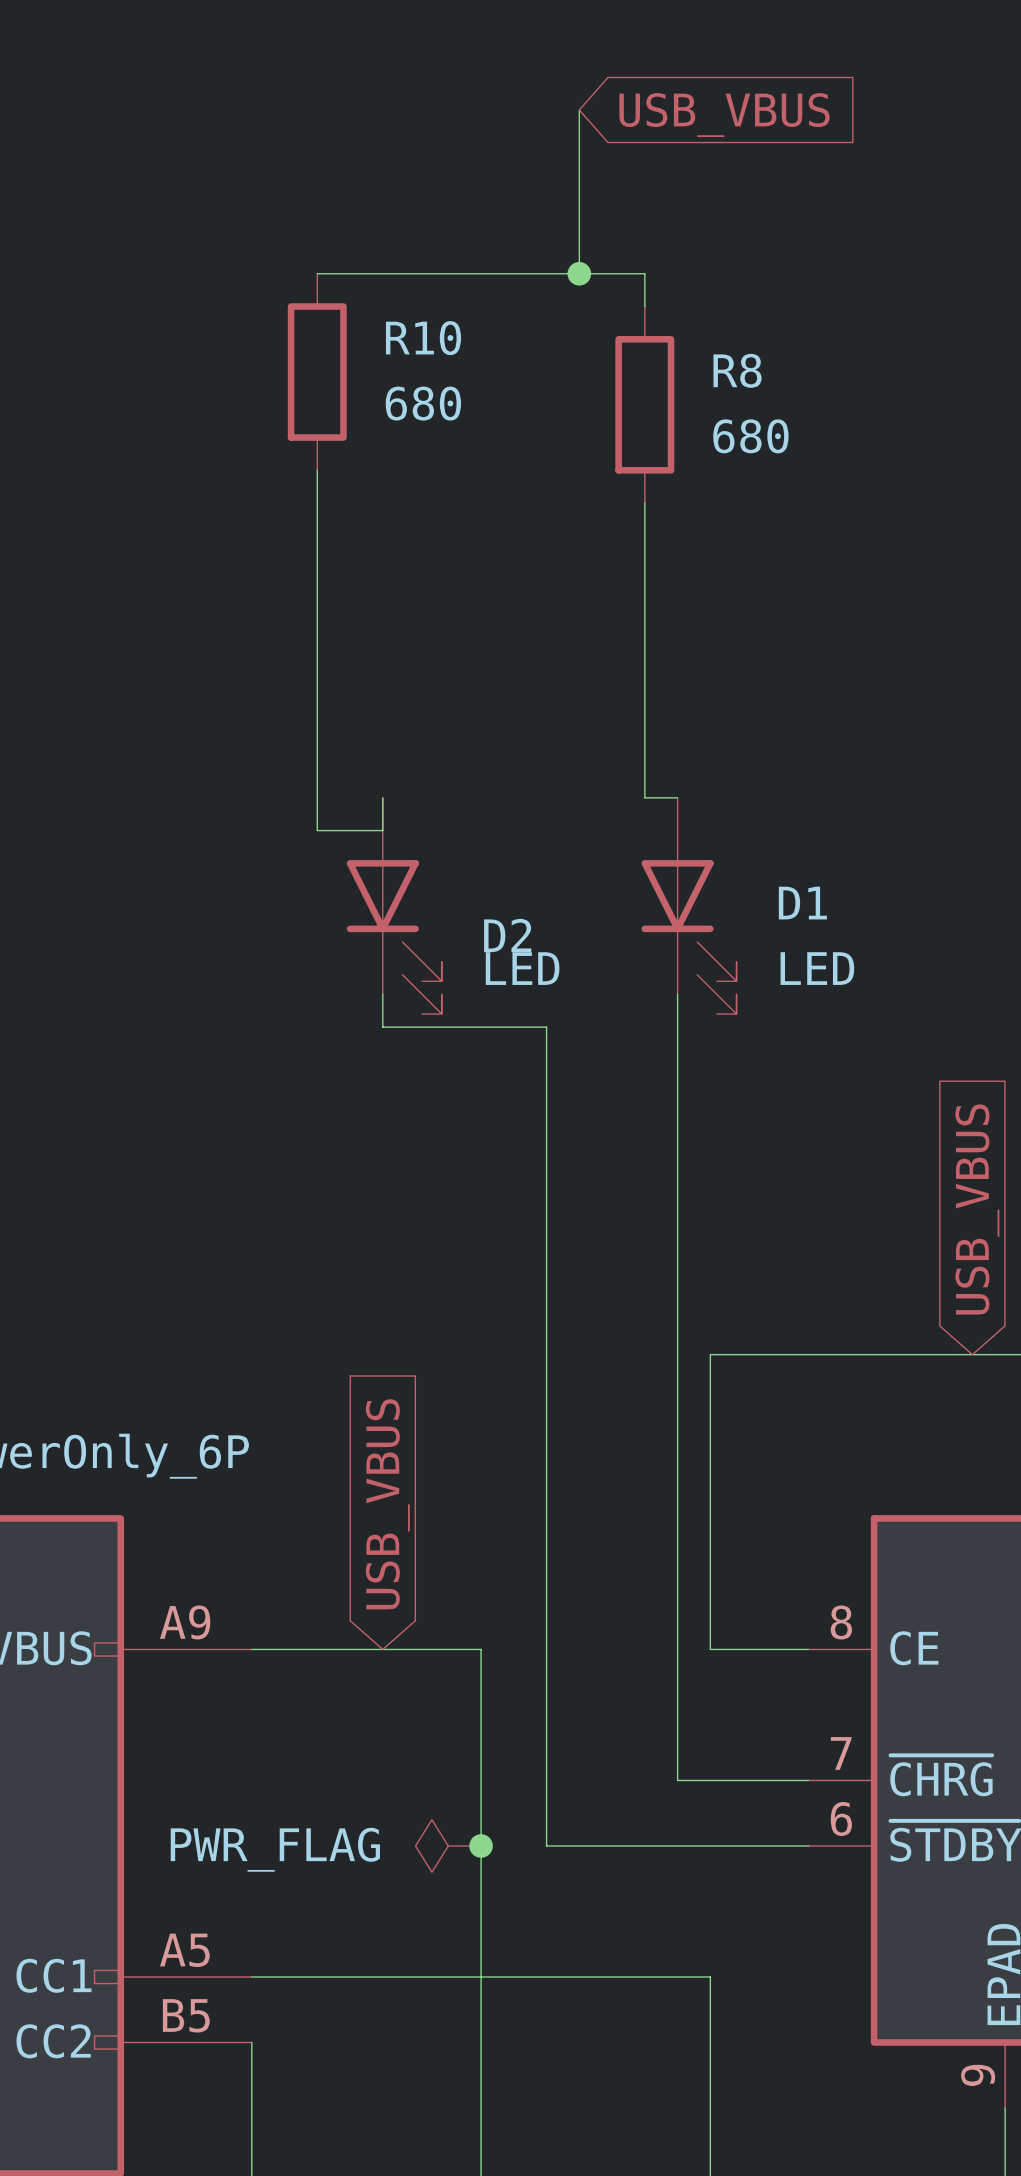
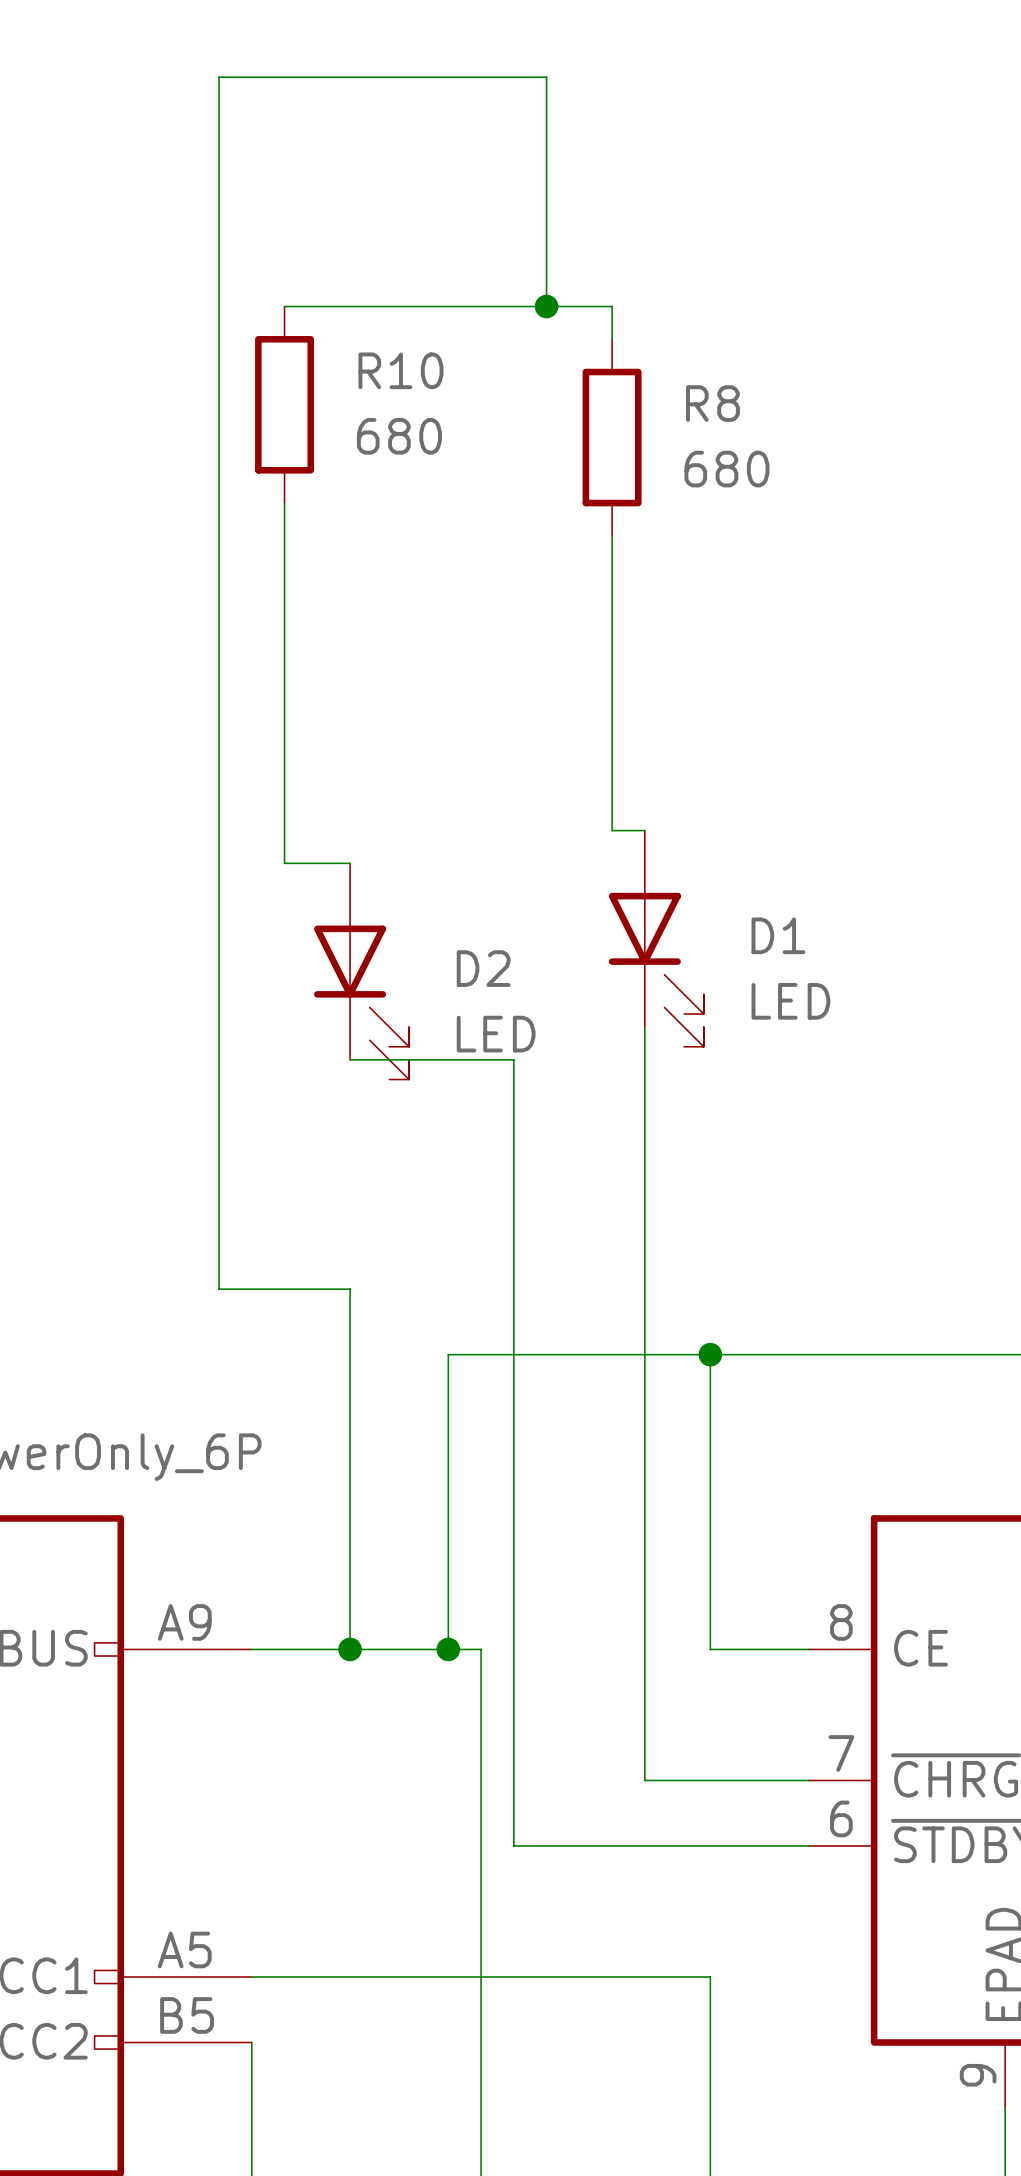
wire: (579, 110) (579, 273) -> none
global label: USB_VBUS (724, 115) -> none
wire: (317, 273) (644, 273) (644, 306) -> (284, 306) (612, 306) (612, 339)
junction position: (579, 273) -> (546, 306)
wire: none -> (546, 306) (546, 77) (219, 77) (219, 1289) (350, 1289) (350, 1649)
R10 position: (317, 372) -> (284, 404)
R8 position: (644, 404) -> (612, 437)
wire: (317, 470) (317, 830) (382, 830) (382, 797) -> none
wire: none -> (284, 503) (284, 863) (350, 863)
wire: (644, 503) (644, 797) (677, 797) -> (612, 535) (612, 830) (644, 830)
D2 position: (394, 905) -> (361, 971)
D1 position: (689, 905) -> (656, 938)
D2 name position: D2 (507, 935) -> D2 (483, 968)
wire: (382, 994) (382, 1027) (546, 1027) (546, 1845) -> (350, 1059) (513, 1059) (513, 1845) (546, 1845)
wire: (677, 994) (677, 1780) -> (644, 1027) (644, 1780) (677, 1780)
global label: USB_VBUS (977, 1209) -> none
wire: none -> (710, 1354) (448, 1354) (448, 1649)
junction: none -> (710, 1354)
global label: USB_VBUS (387, 1504) -> none
junction: none -> (350, 1649)
junction: none -> (448, 1649)
power symbol: PWR_FLAG (448, 1845) -> none
junction: (481, 1845) -> none

